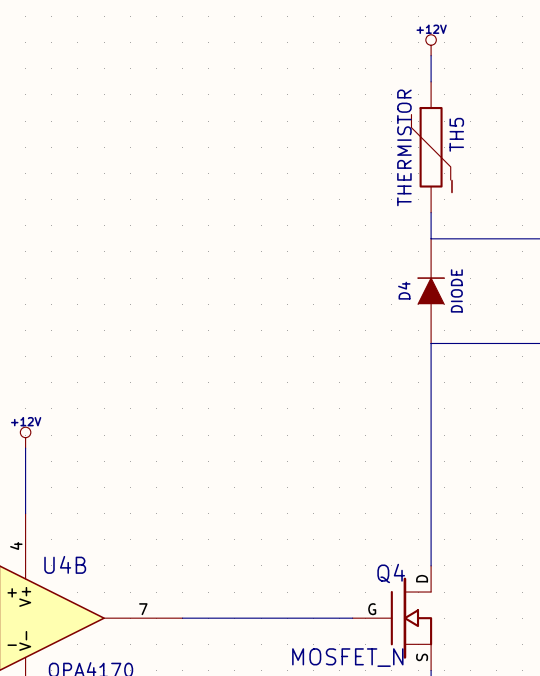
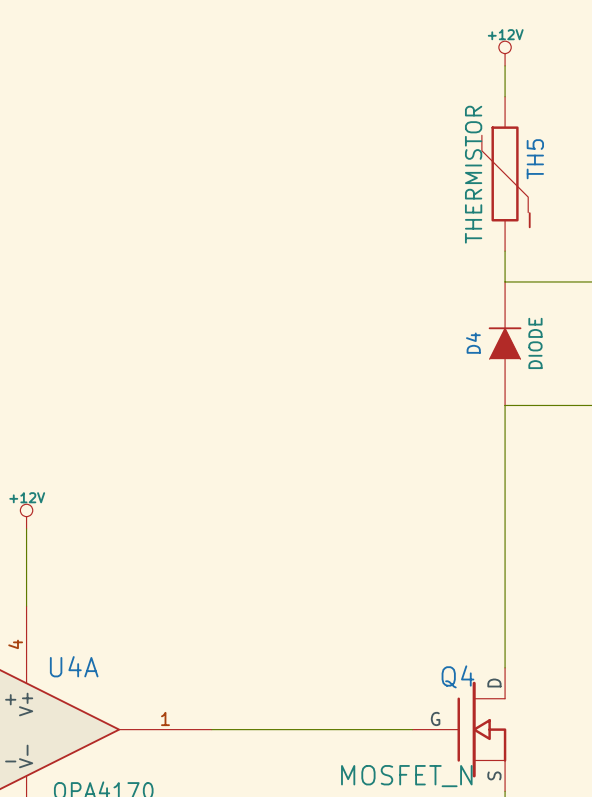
U4B name: U4B (65, 564) -> U4A (74, 666)
U4B pin number: 7 (143, 609) -> 1 (165, 718)

